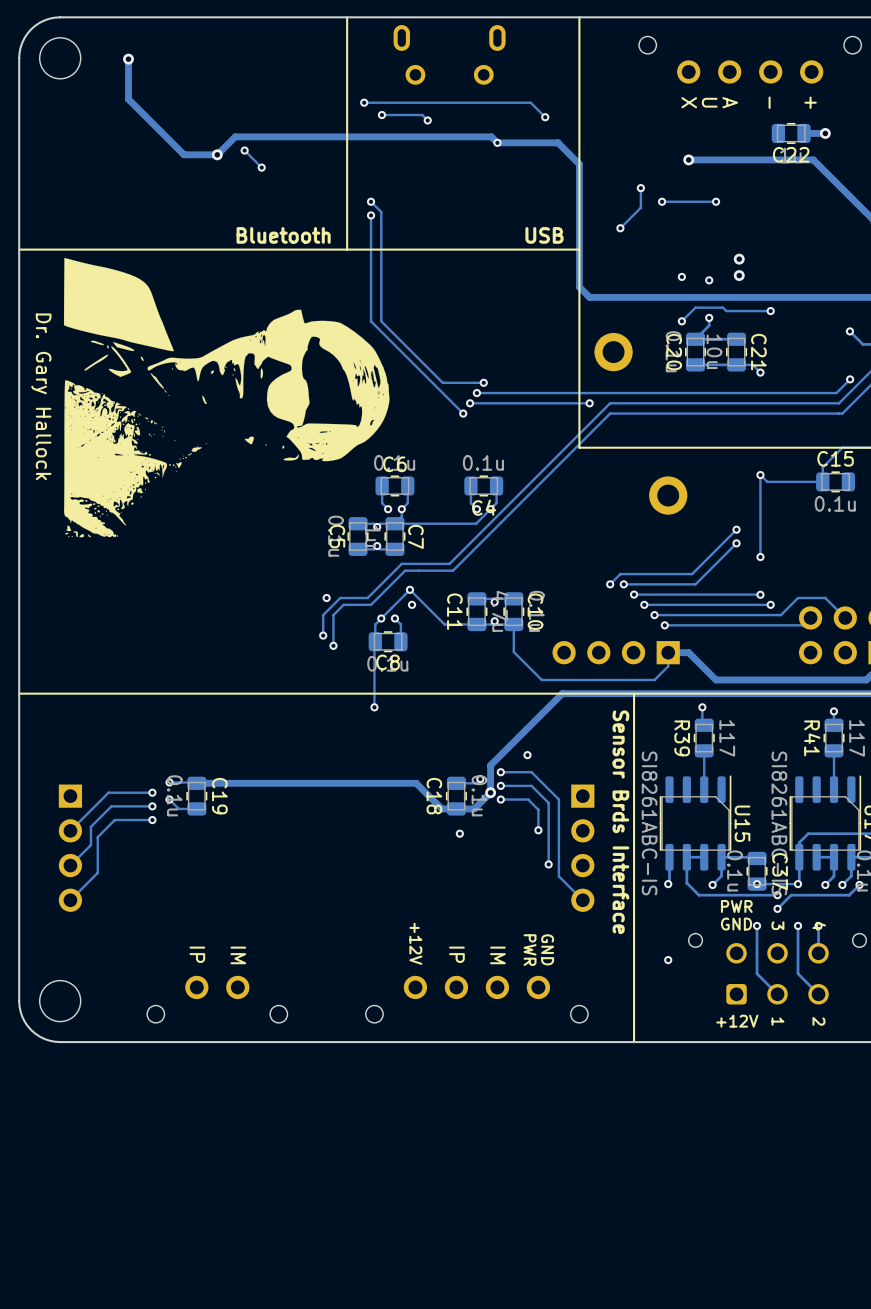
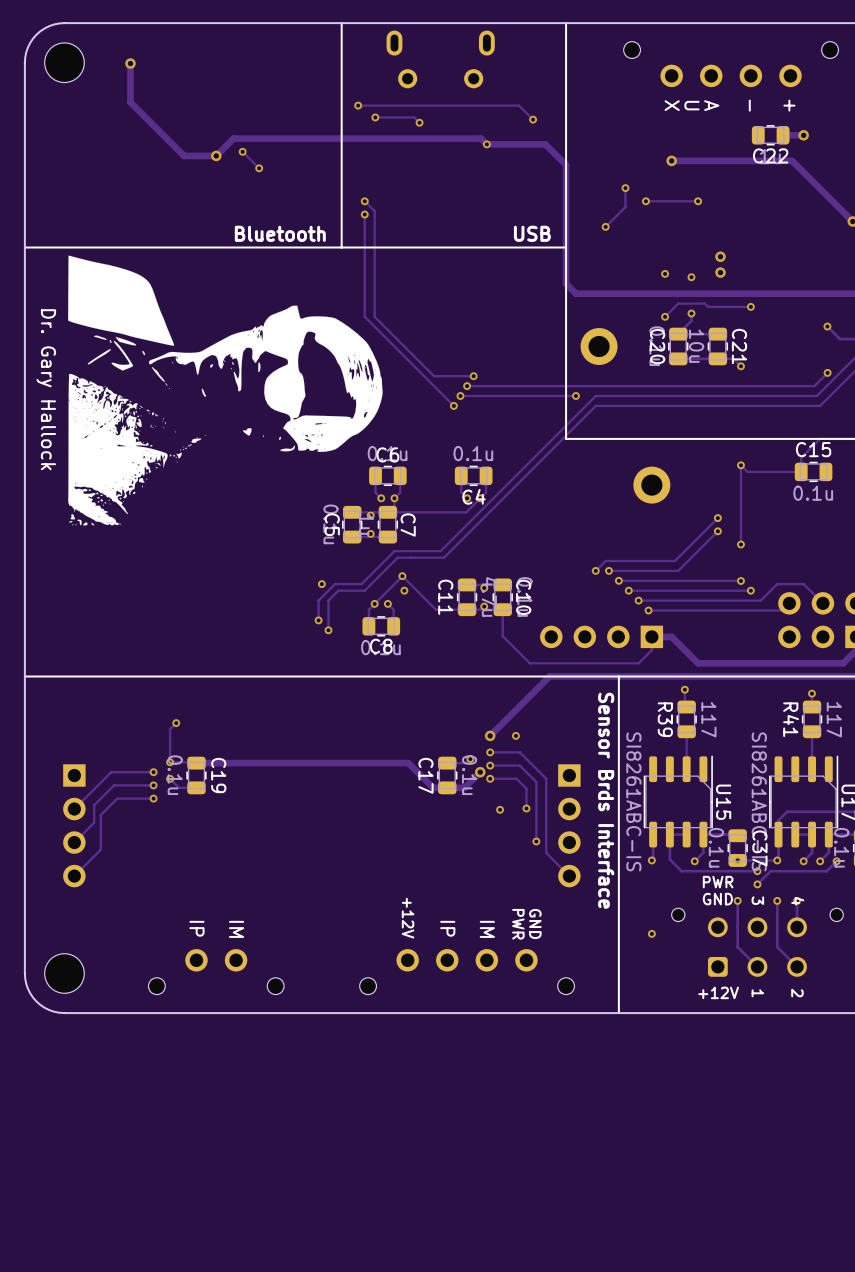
track: (375, 641) (374, 707) -> none
via: (374, 707) -> none
track: none -> (176, 723) (170, 729) (170, 762)
via: none -> (176, 723)
track: (500, 755) (490, 765) (490, 792) -> none
via: none -> (490, 735)
C18 name: C18 (434, 796) -> C17 (425, 775)
via position: (459, 833) -> (500, 809)

